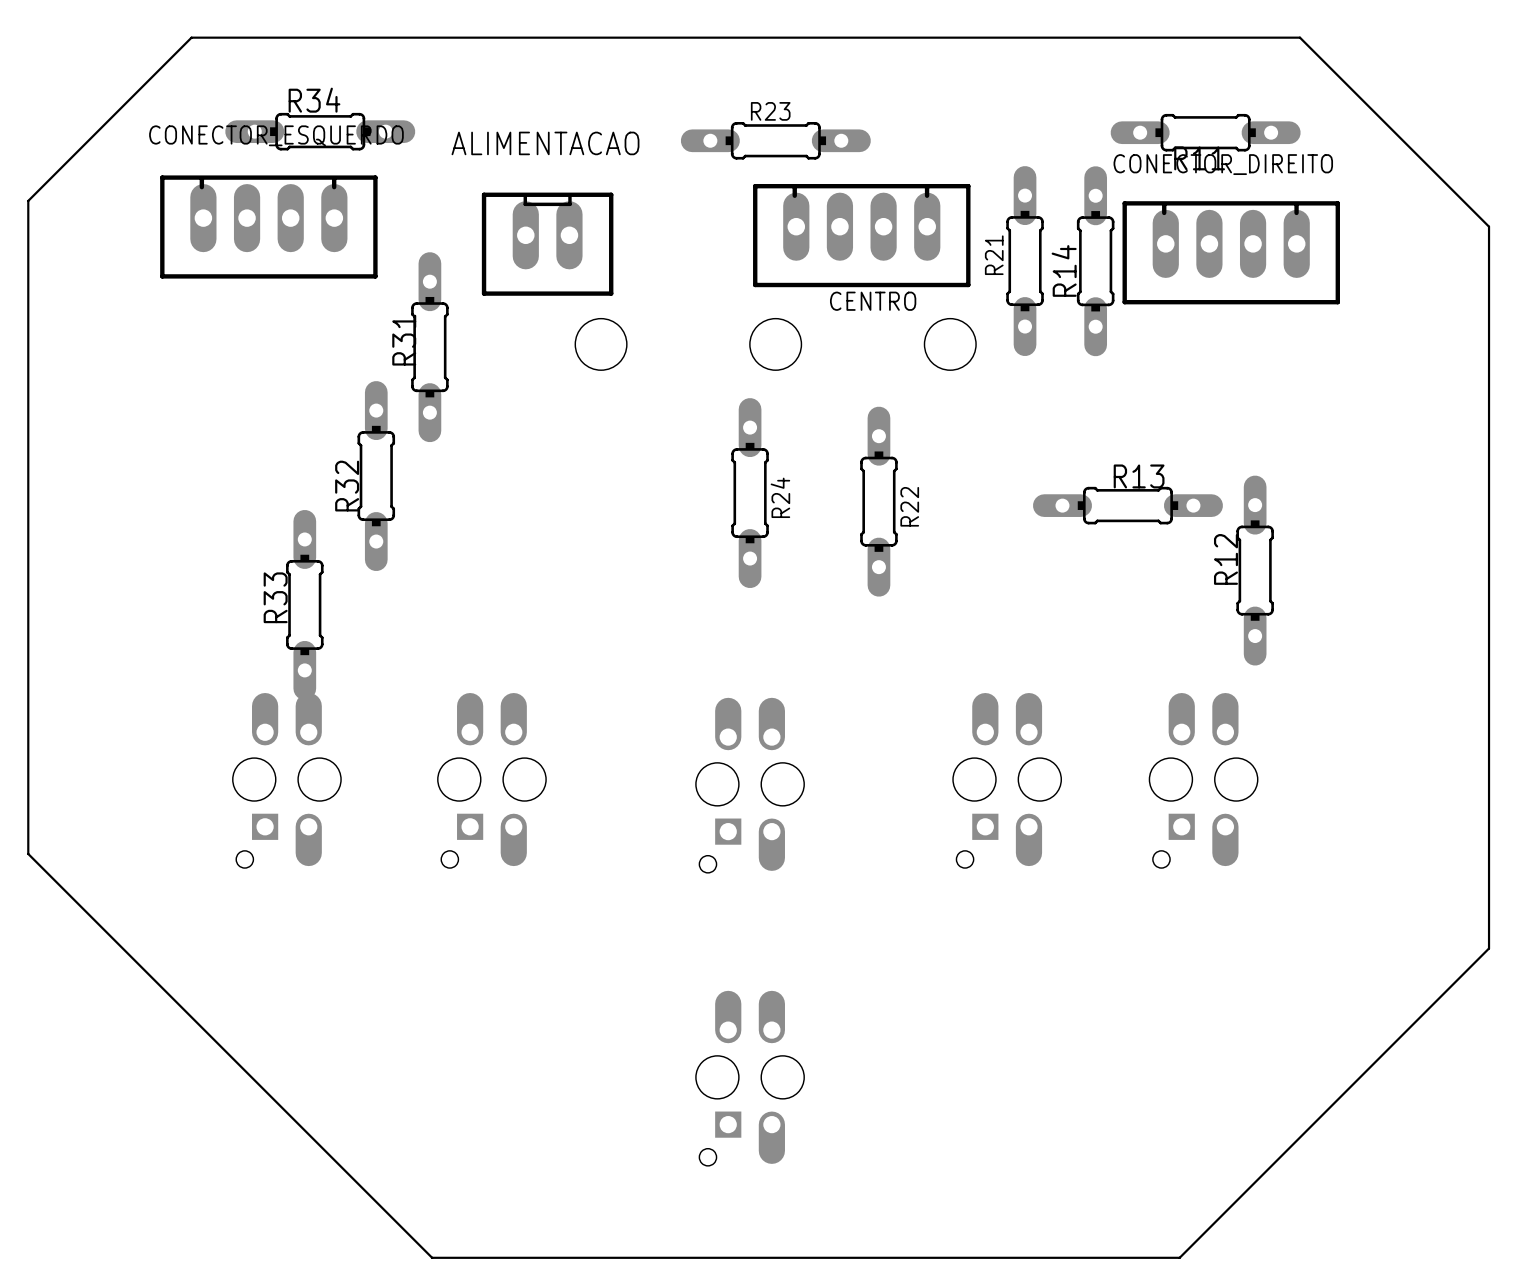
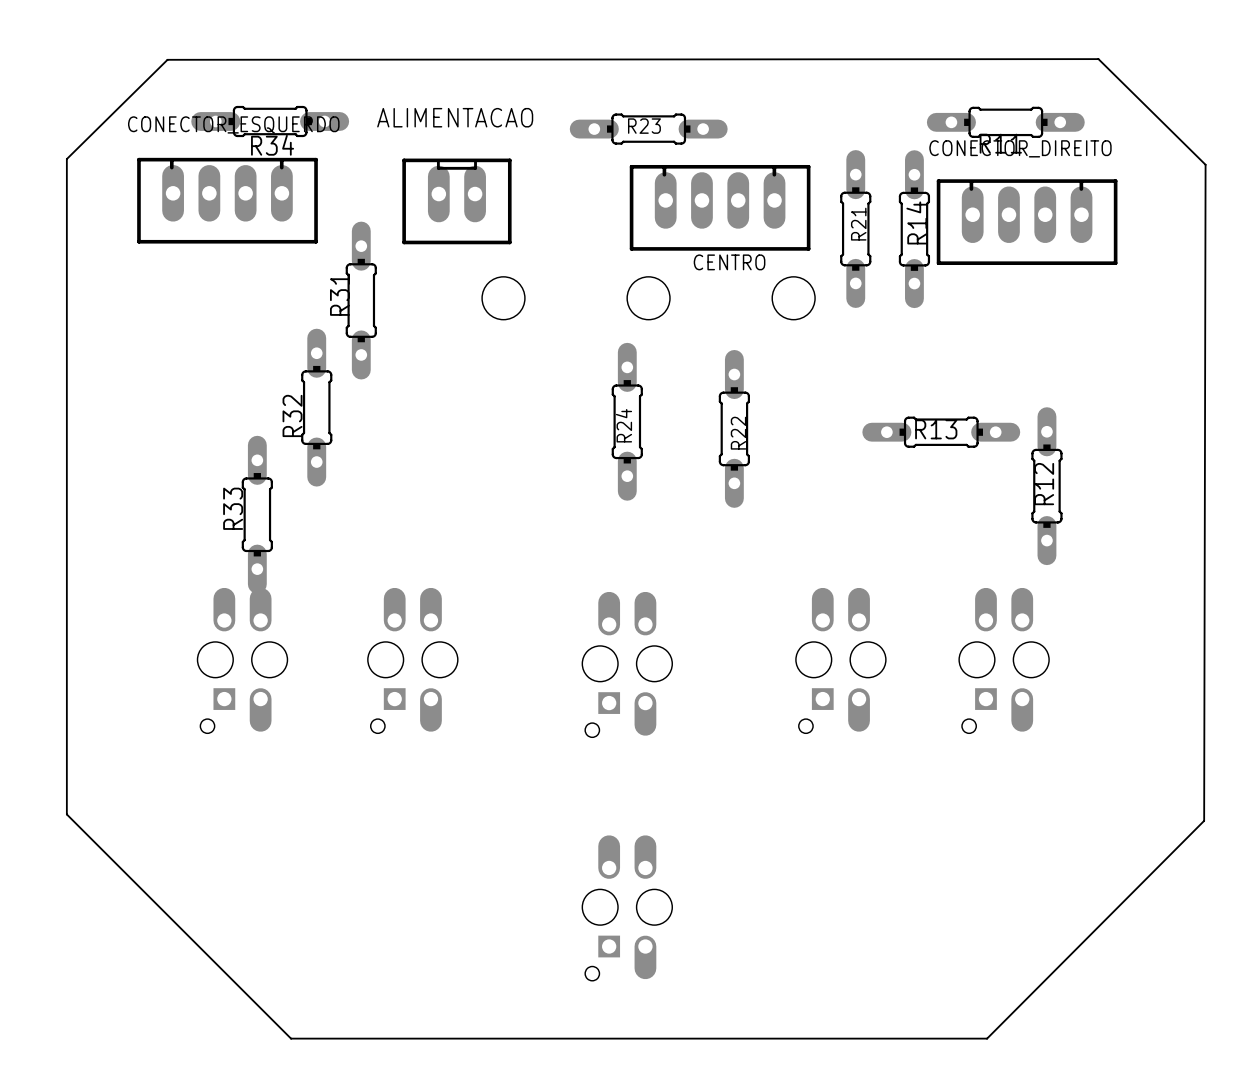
board edge: (191, 37) (1299, 37) (1489, 226) (1489, 948) (1179, 1257) (432, 1257) (28, 853) (28, 200) (191, 37) -> (1098, 59) (167, 59) (66, 159) (66, 814) (291, 1038) (987, 1038) (1204, 820) (1205, 164) (1098, 59)
R34 name position: R34 (314, 100) -> R34 (272, 145)
R23 name position: R23 (770, 111) -> R23 (644, 126)
ALIMENTACAO position: (547, 244) -> (456, 201)
R21 name position: R21 (994, 255) -> R21 (858, 224)
R14 name position: R14 (1064, 270) -> R14 (916, 222)
R13 name position: R13 (1139, 476) -> R13 (936, 429)
R24 name position: R24 (780, 497) -> R24 (623, 425)
R22 name position: R22 (909, 506) -> R22 (738, 433)
R12 name position: R12 (1225, 559) -> R12 (1044, 484)

